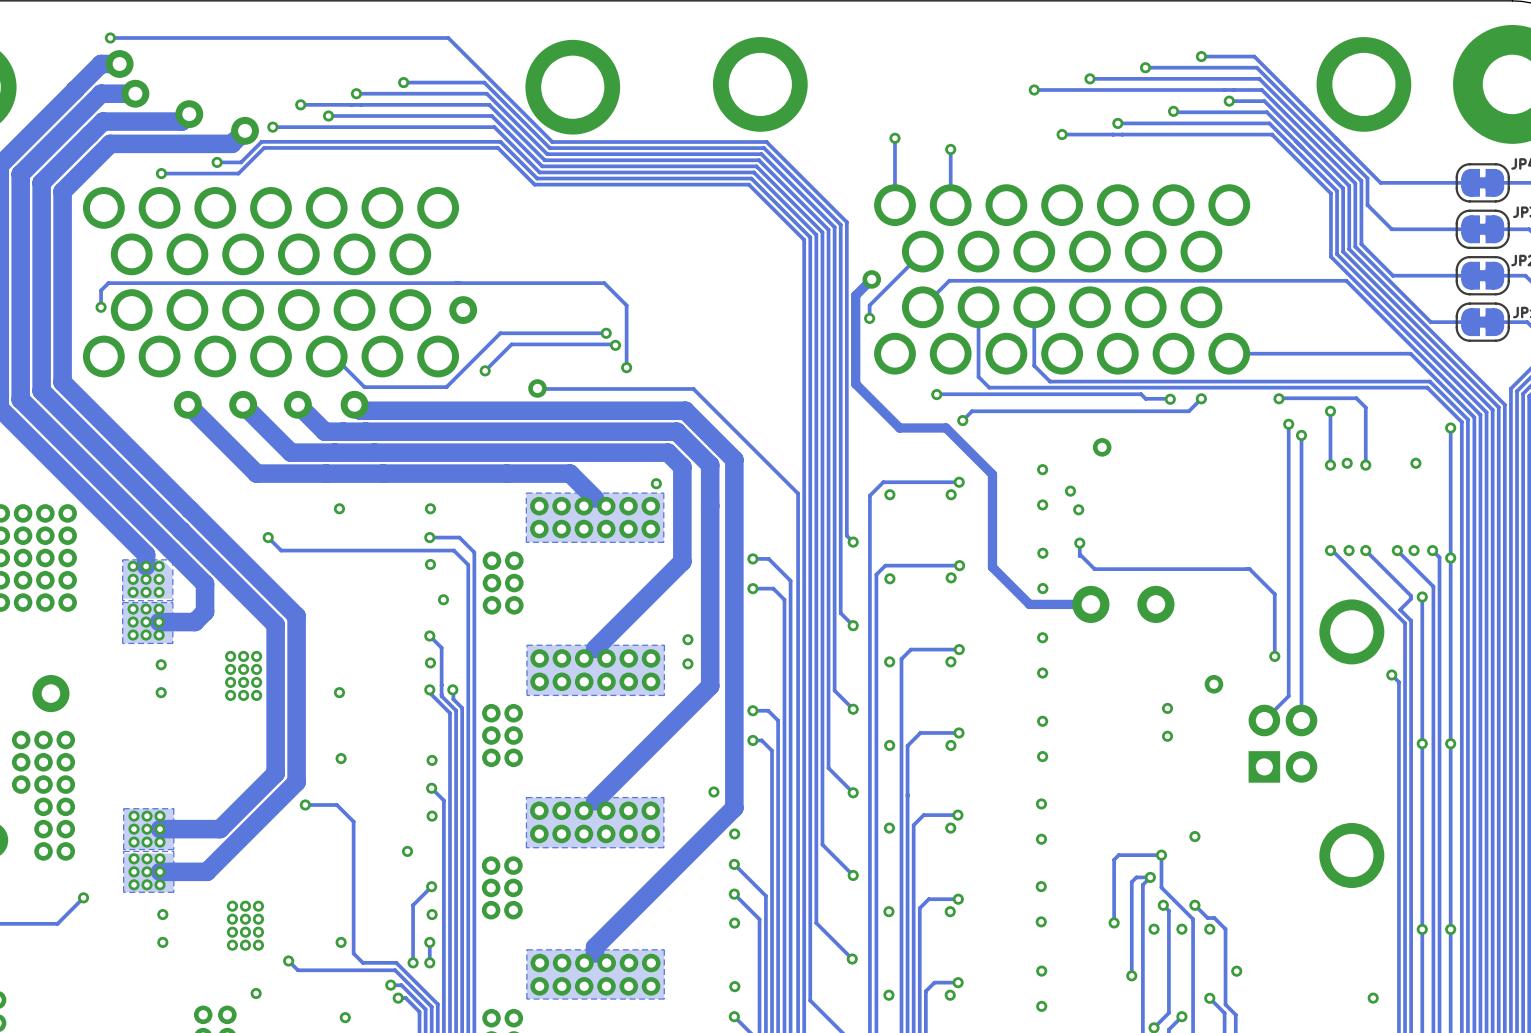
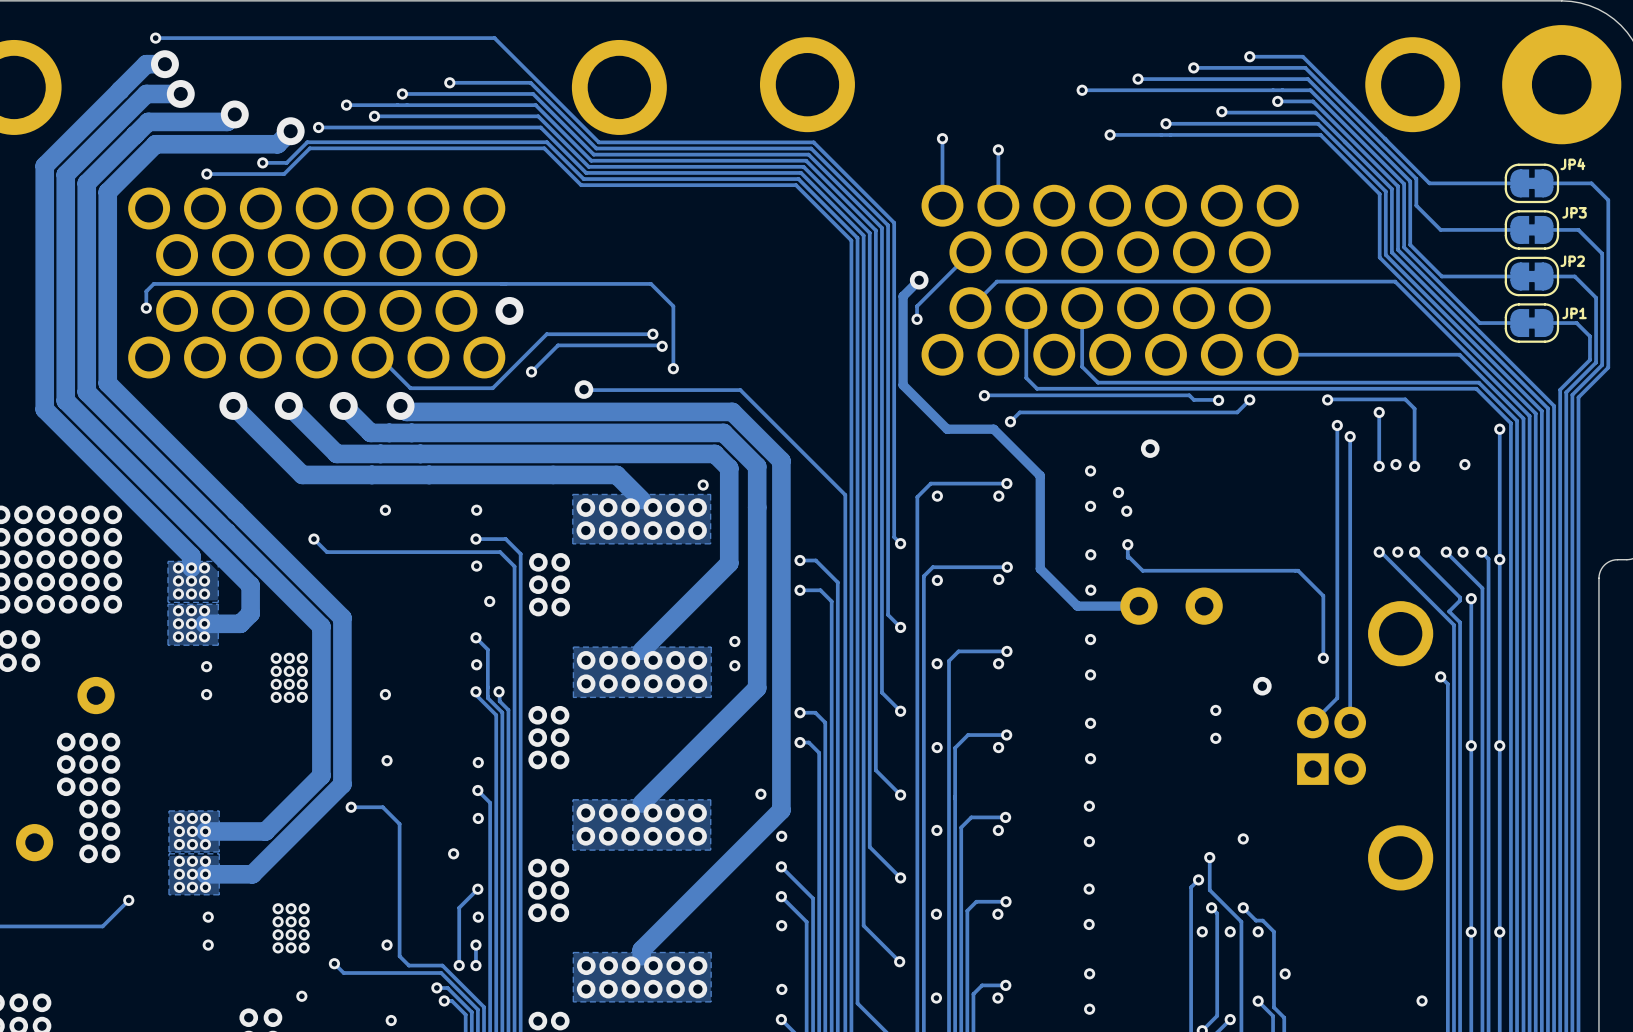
track: (1161, 855) (1118, 855) (1114, 859) (1114, 922) -> none
track: (1150, 877) (1136, 877) (1131, 882) (1131, 975) -> none
via: (1114, 922) -> none
via: (1131, 975) -> none

